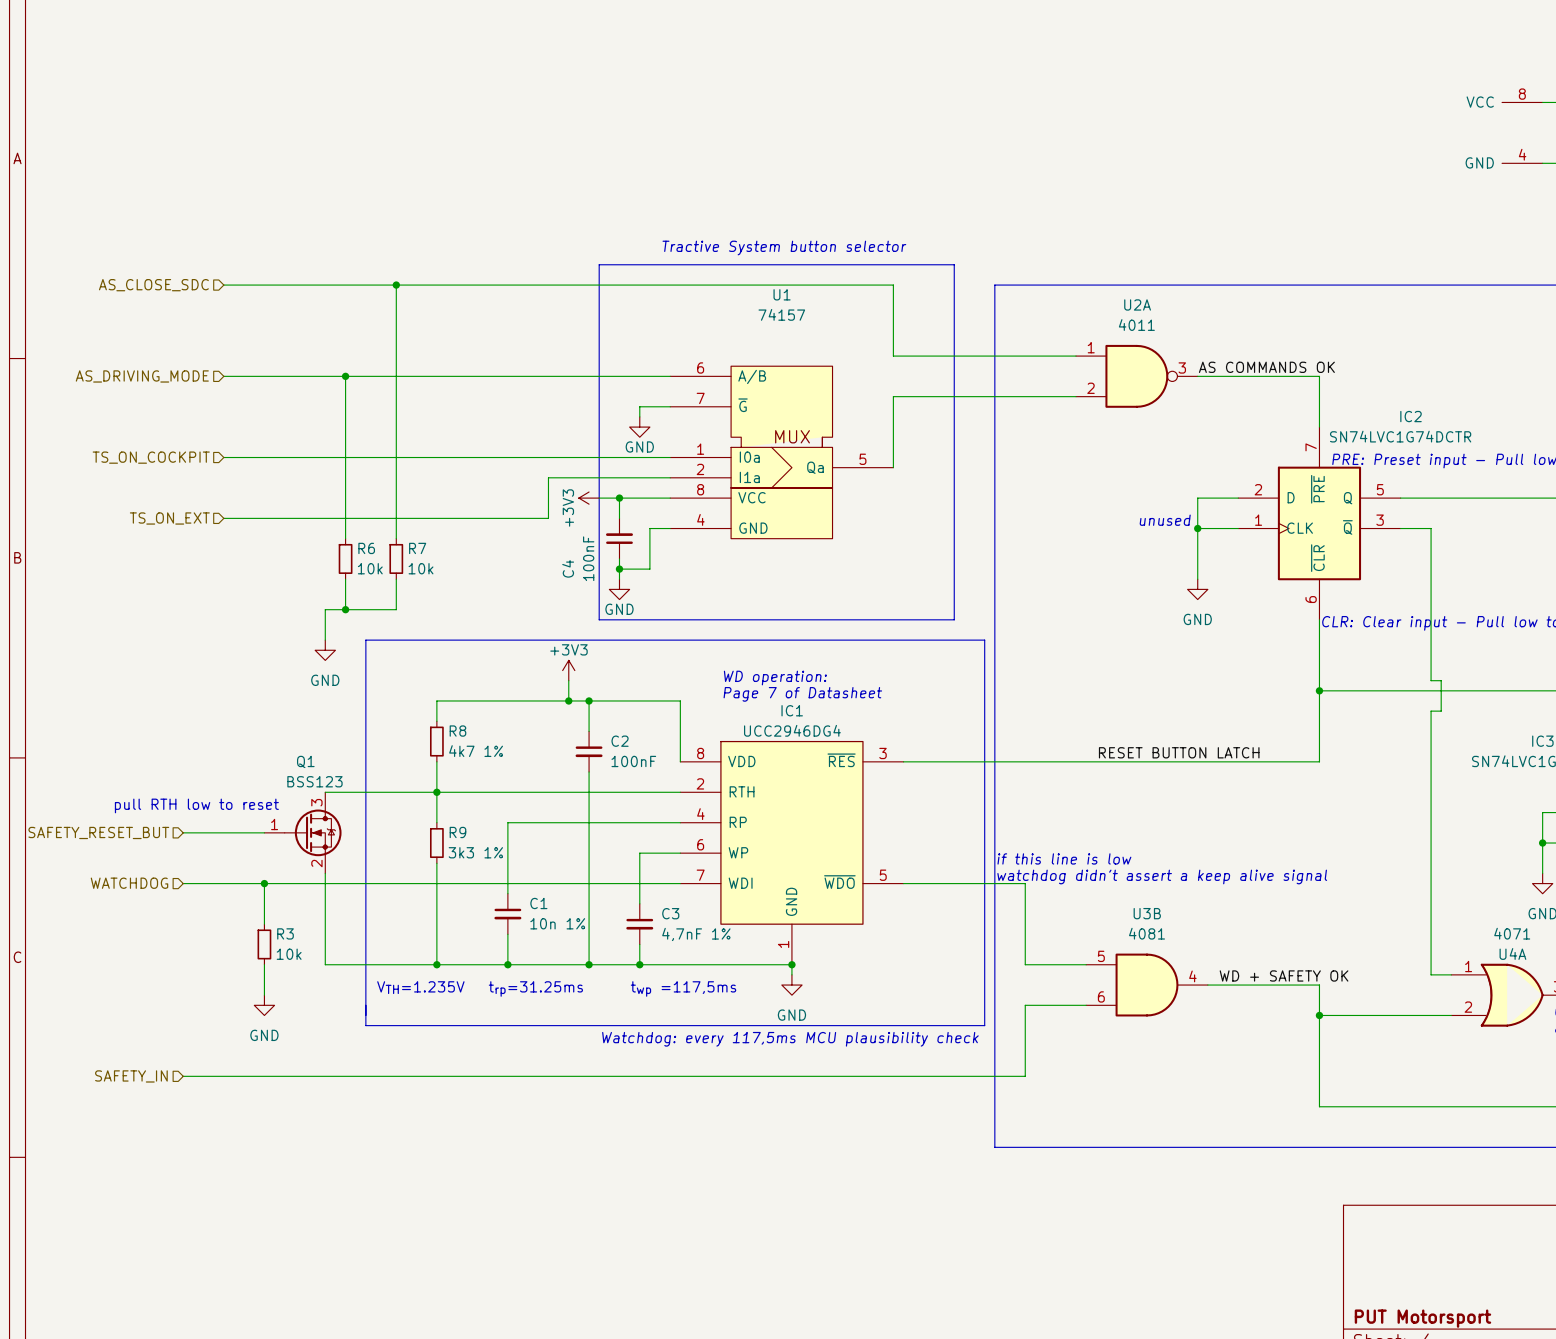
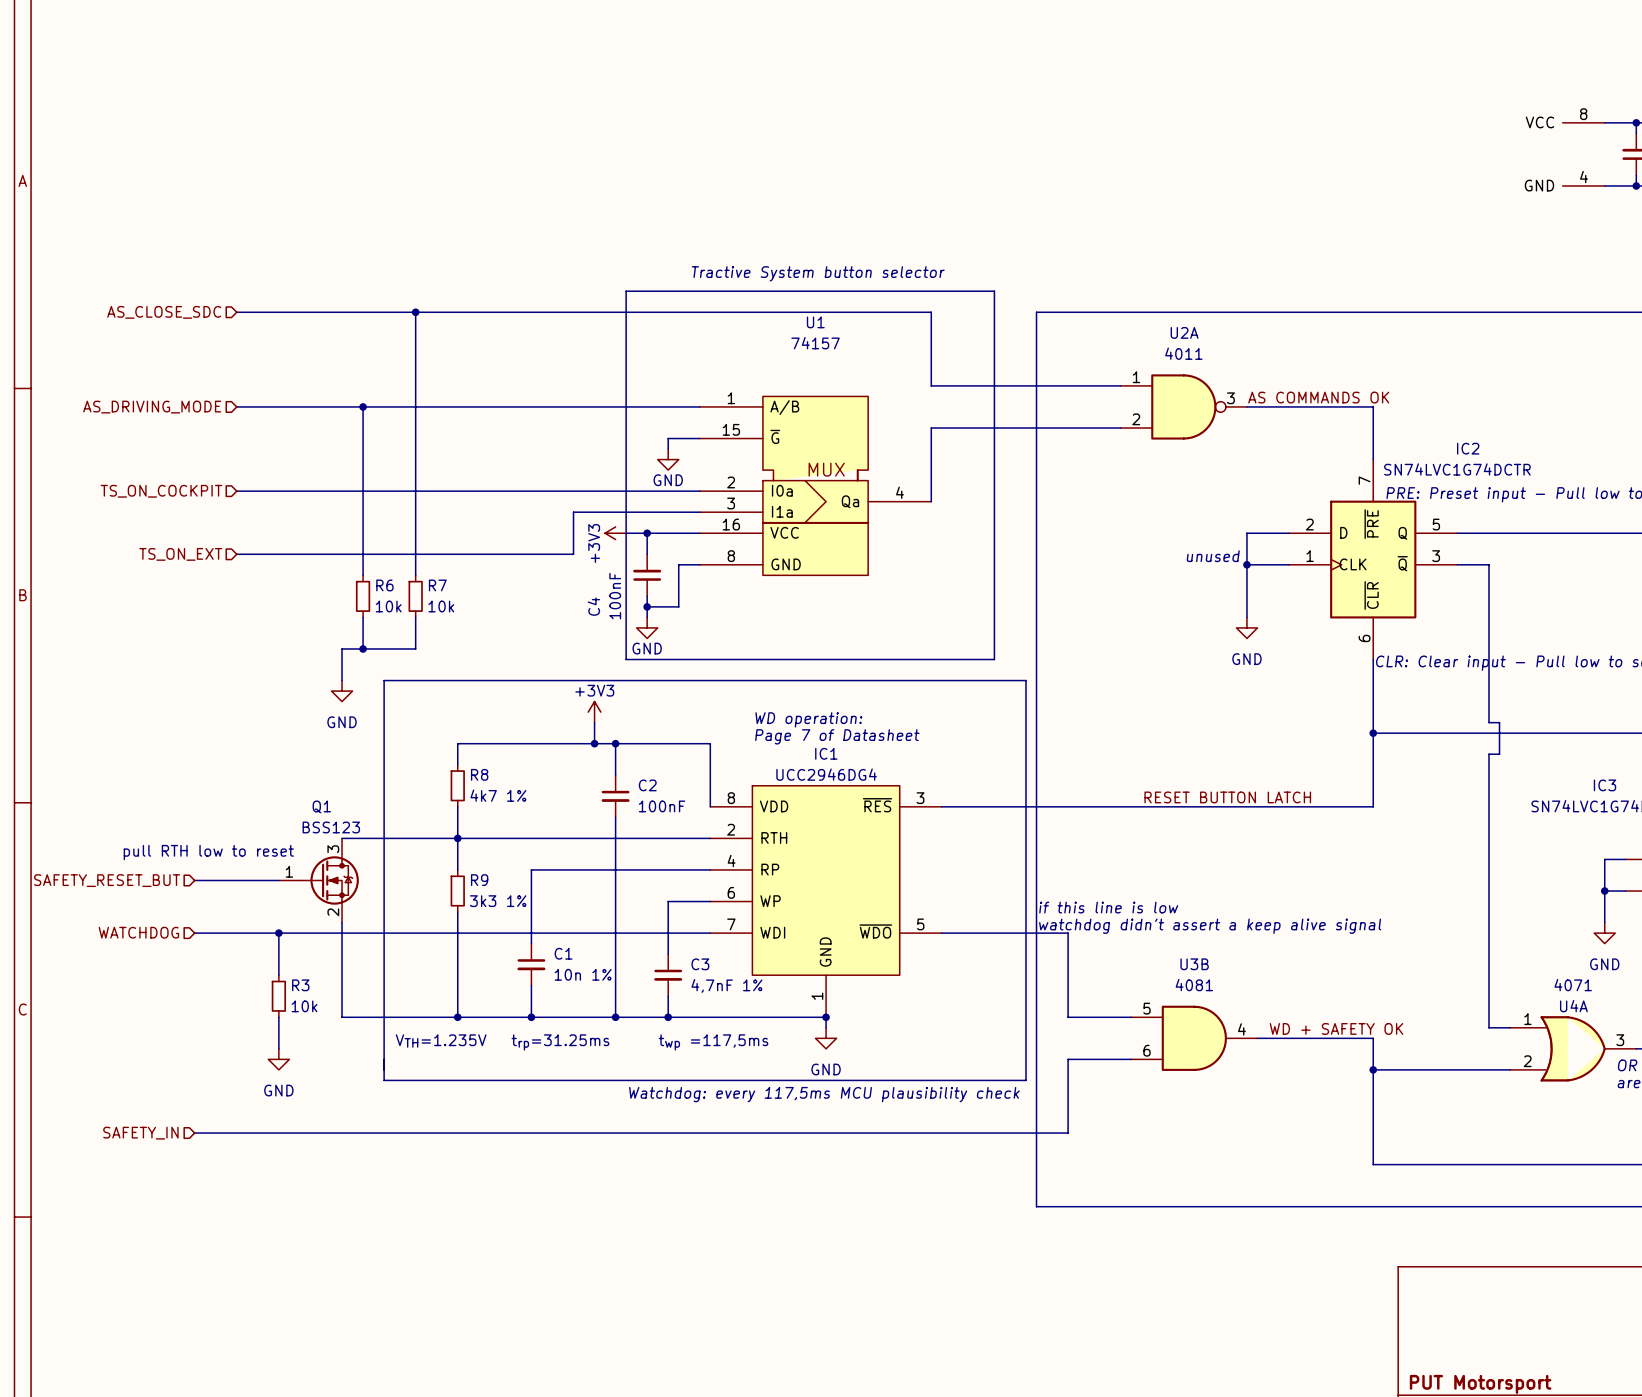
U1 pin number: 6 (700, 367) -> 1 (731, 398)
U1 pin number: 7 (700, 398) -> 15 (731, 429)
U1 pin number: 1 (700, 449) -> 2 (731, 482)
U1 pin number: 5 (862, 459) -> 4 (899, 492)
U1 pin number: 2 (700, 469) -> 3 (731, 503)
U1 pin number: 8 (700, 489) -> 16 (731, 524)
U1 pin number: 4 (700, 519) -> 8 (731, 556)

